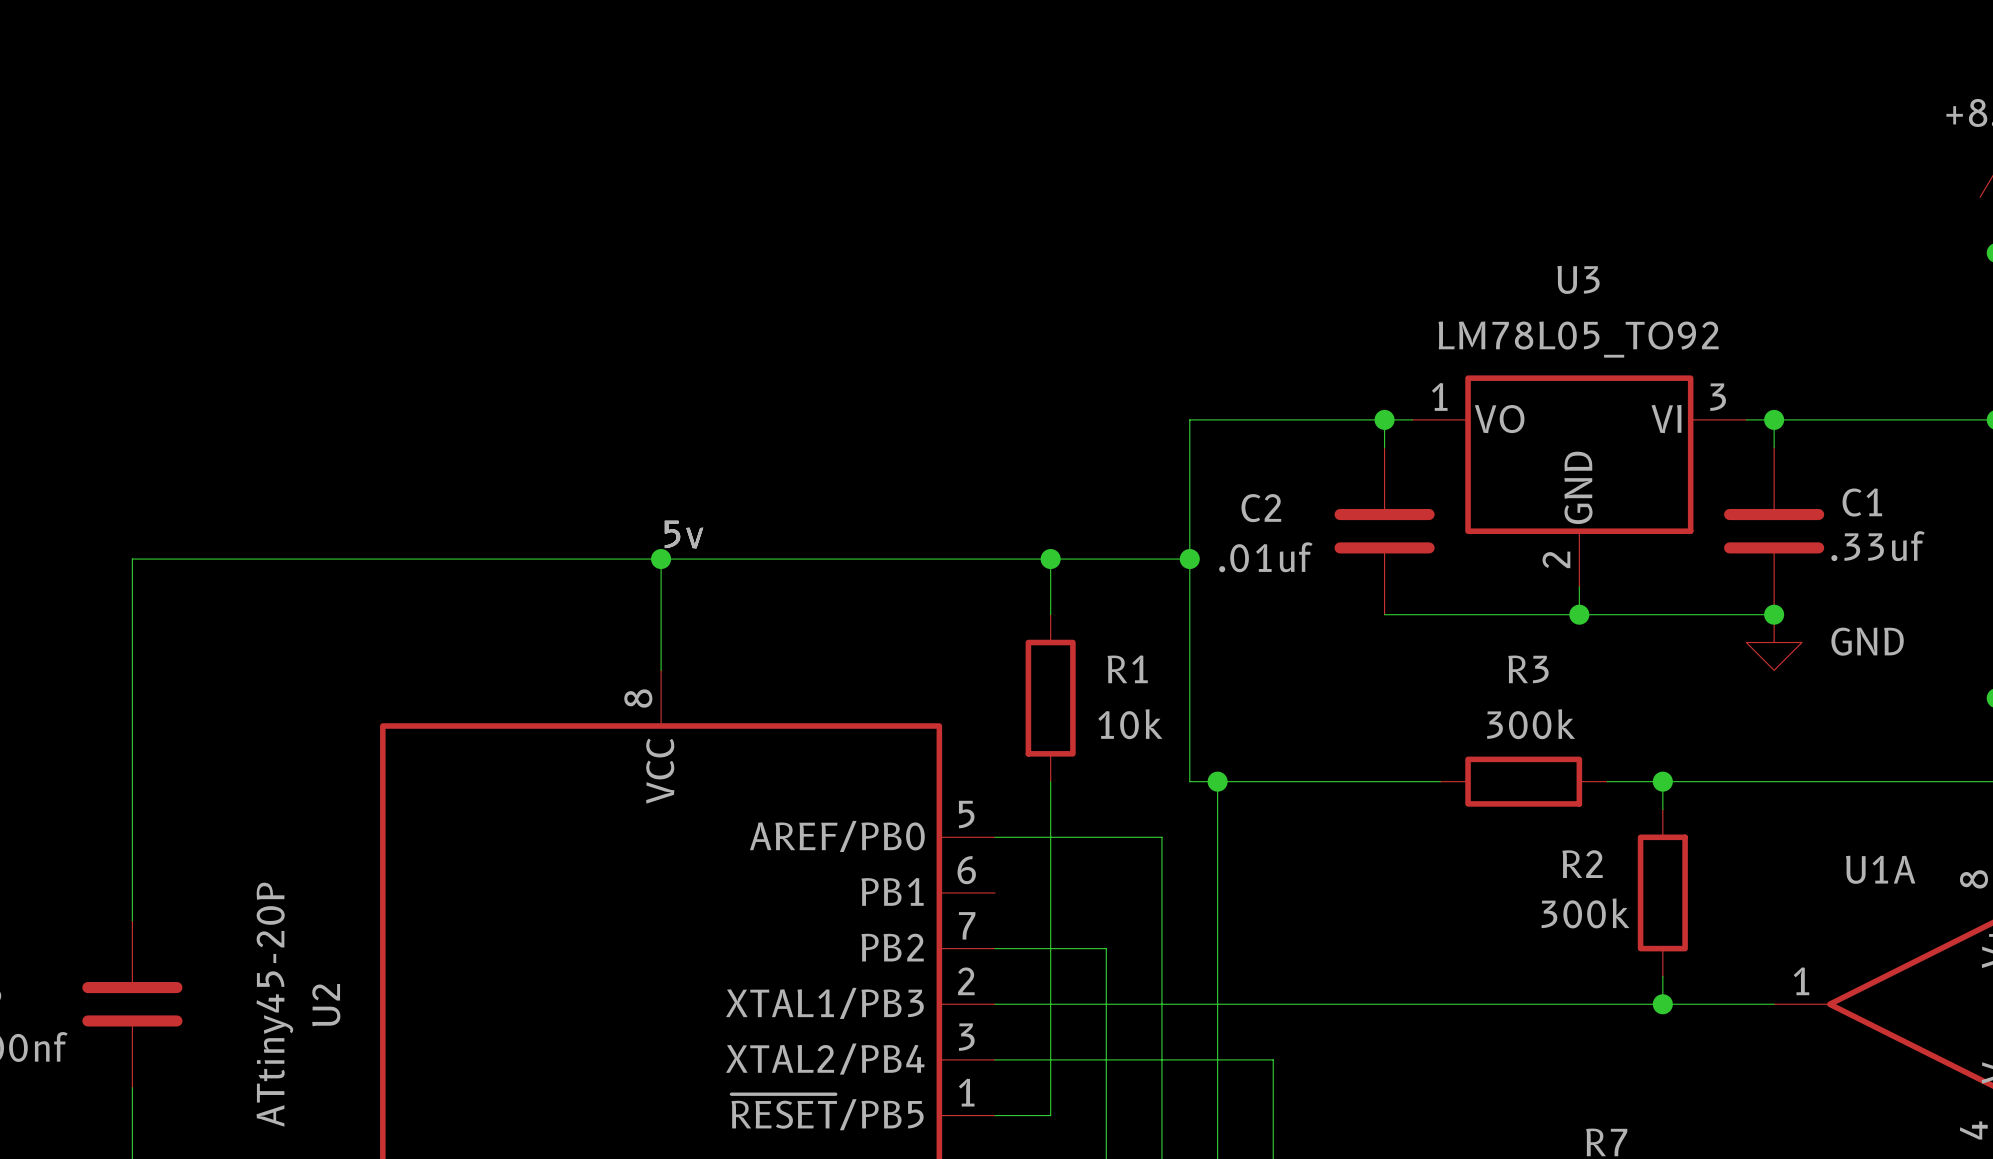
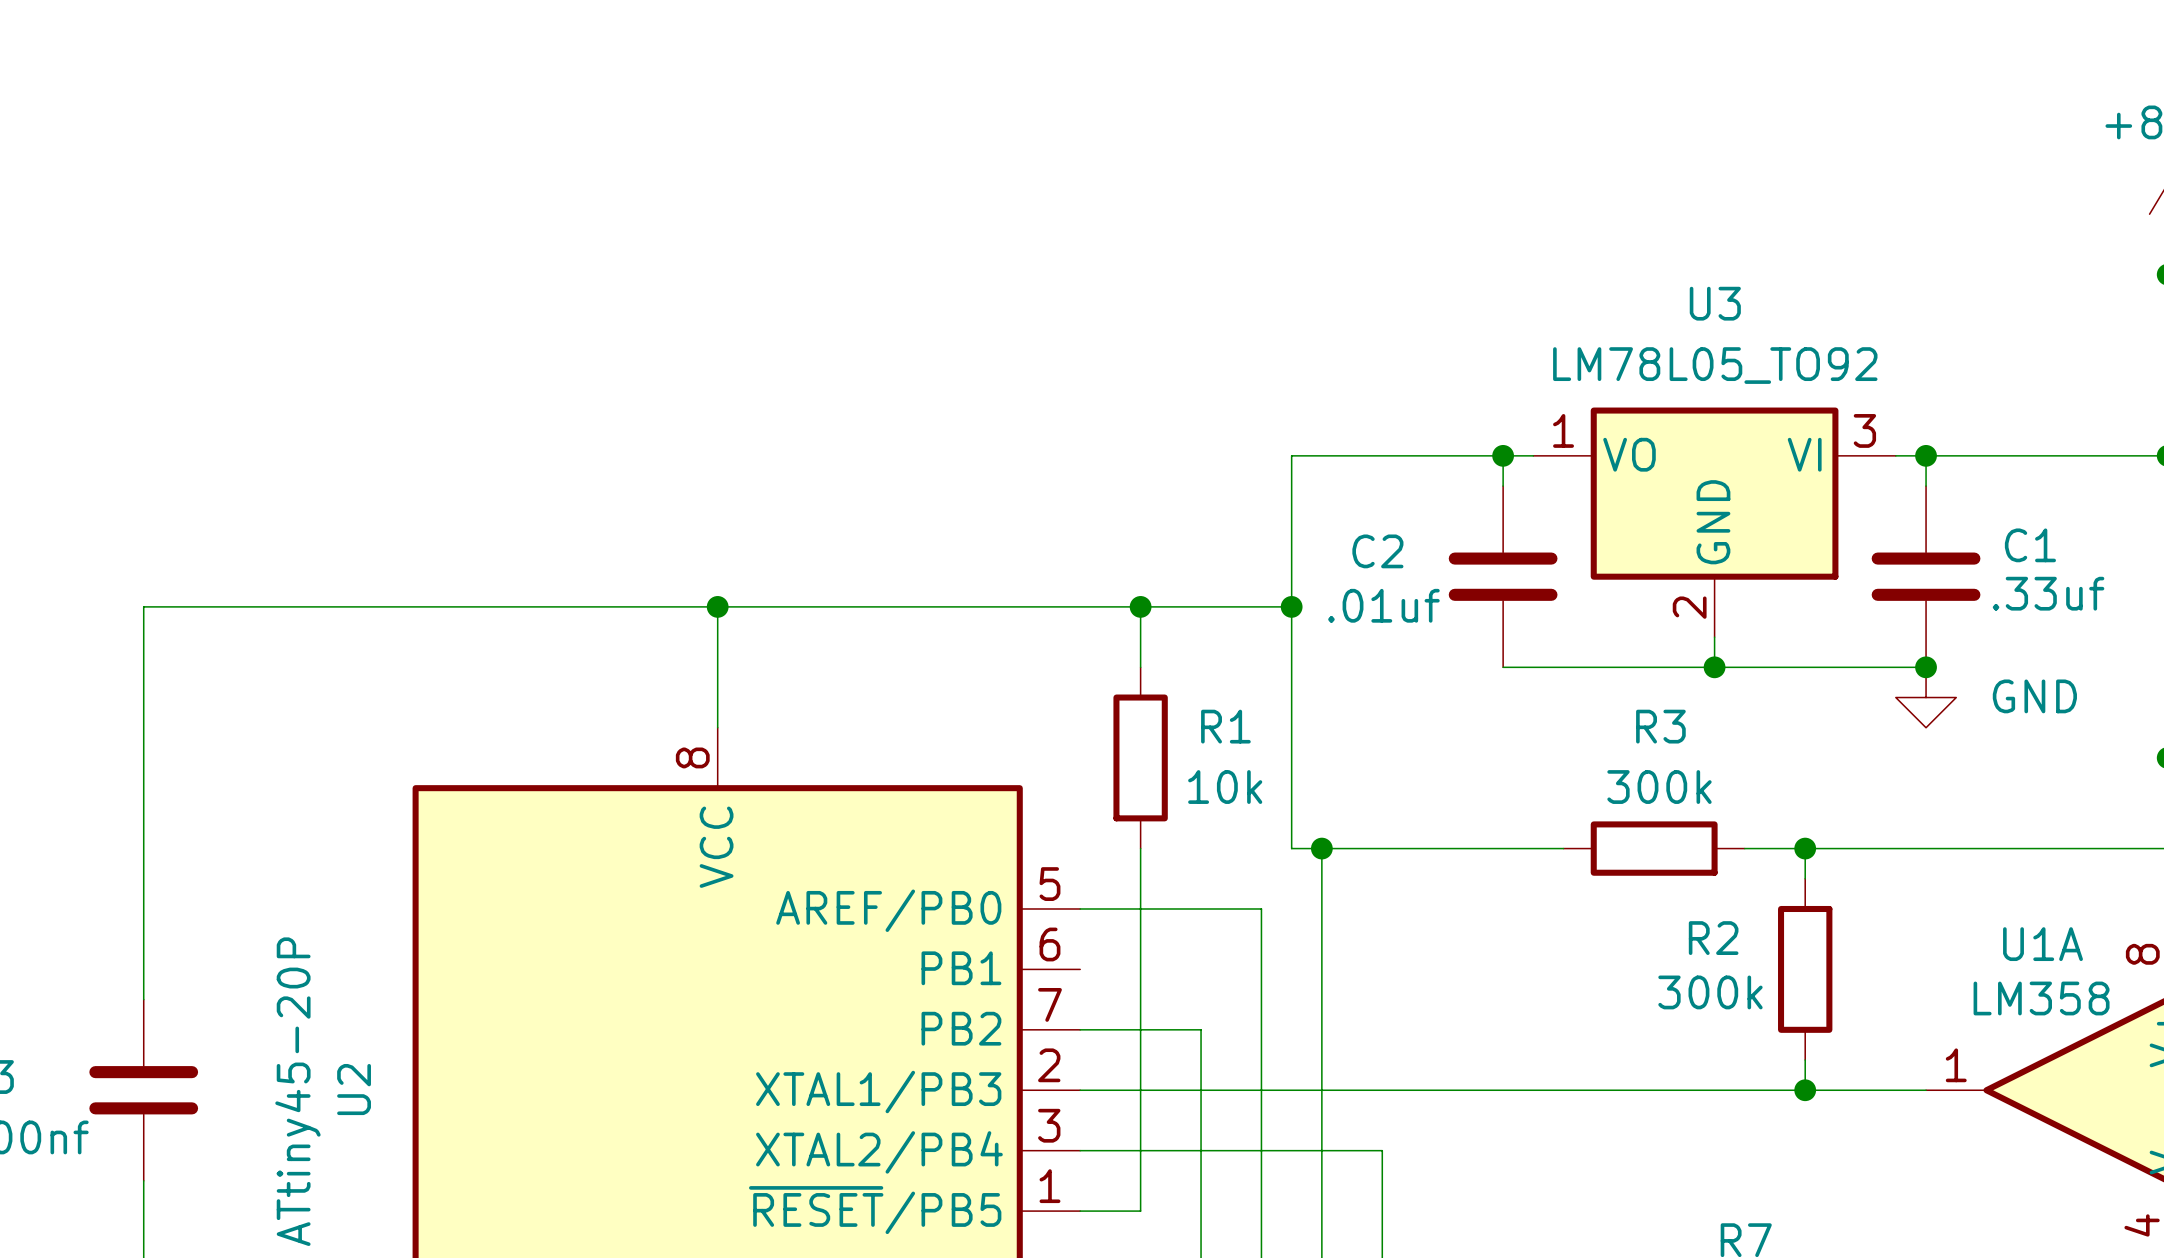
label: 5v (684, 534) -> none
U1A value: none -> LM358 (2041, 998)

